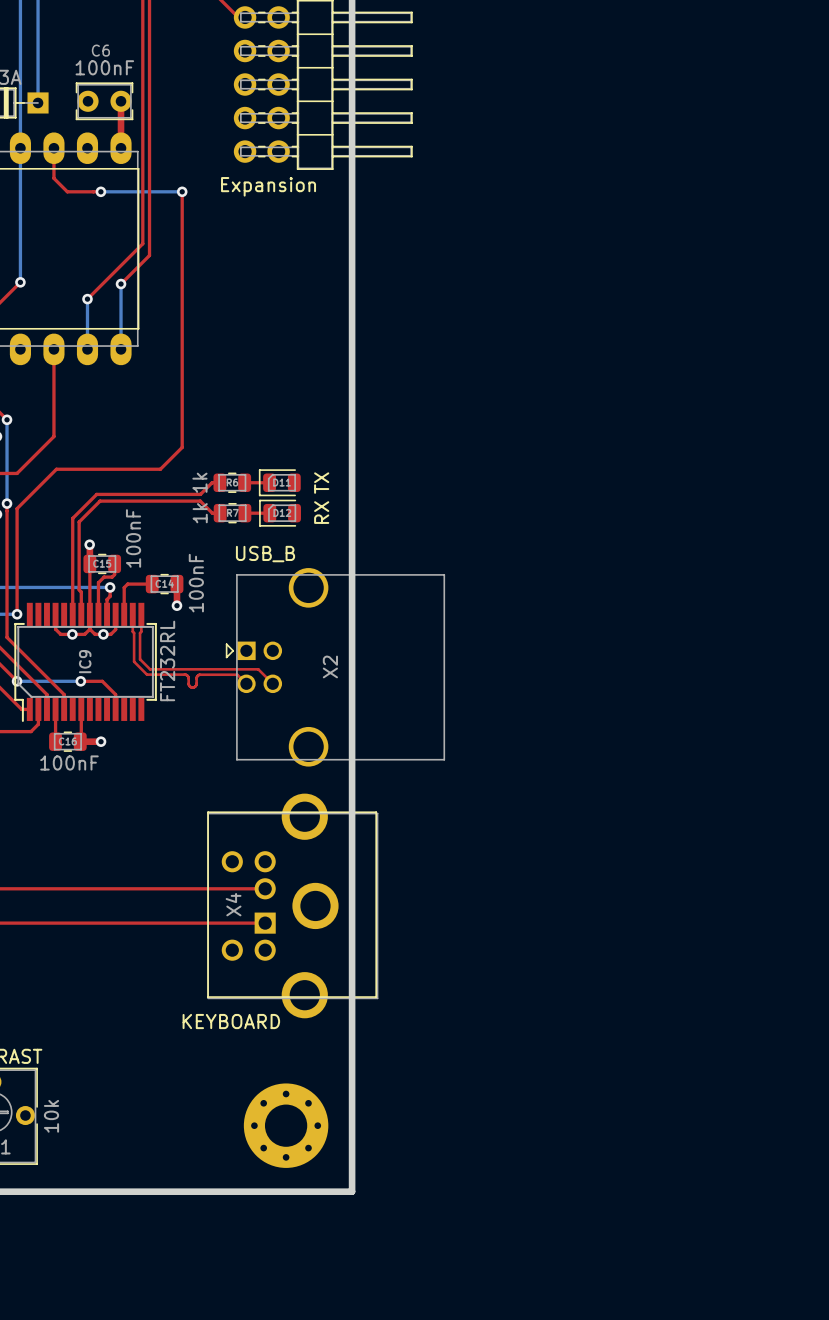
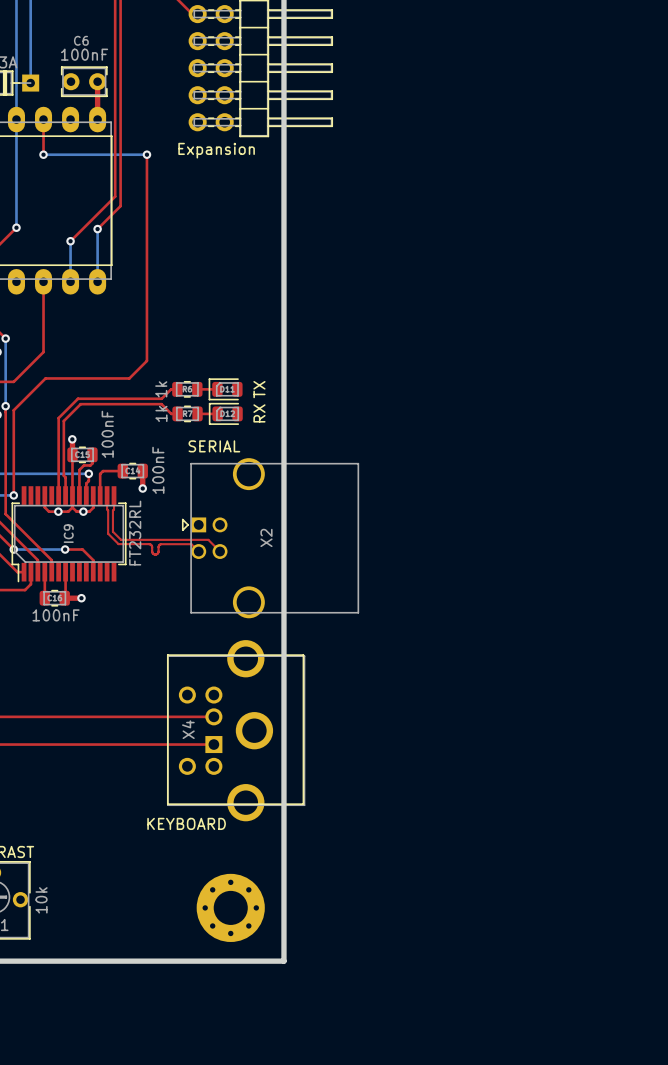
top track: (53, 178) (67, 191) (100, 191) -> (43, 143) (43, 154)
bottom track: none -> (43, 154) (81, 154)
via position: (100, 191) -> (43, 154)
X2 value: USB_B (265, 554) -> SERIAL (214, 446)

